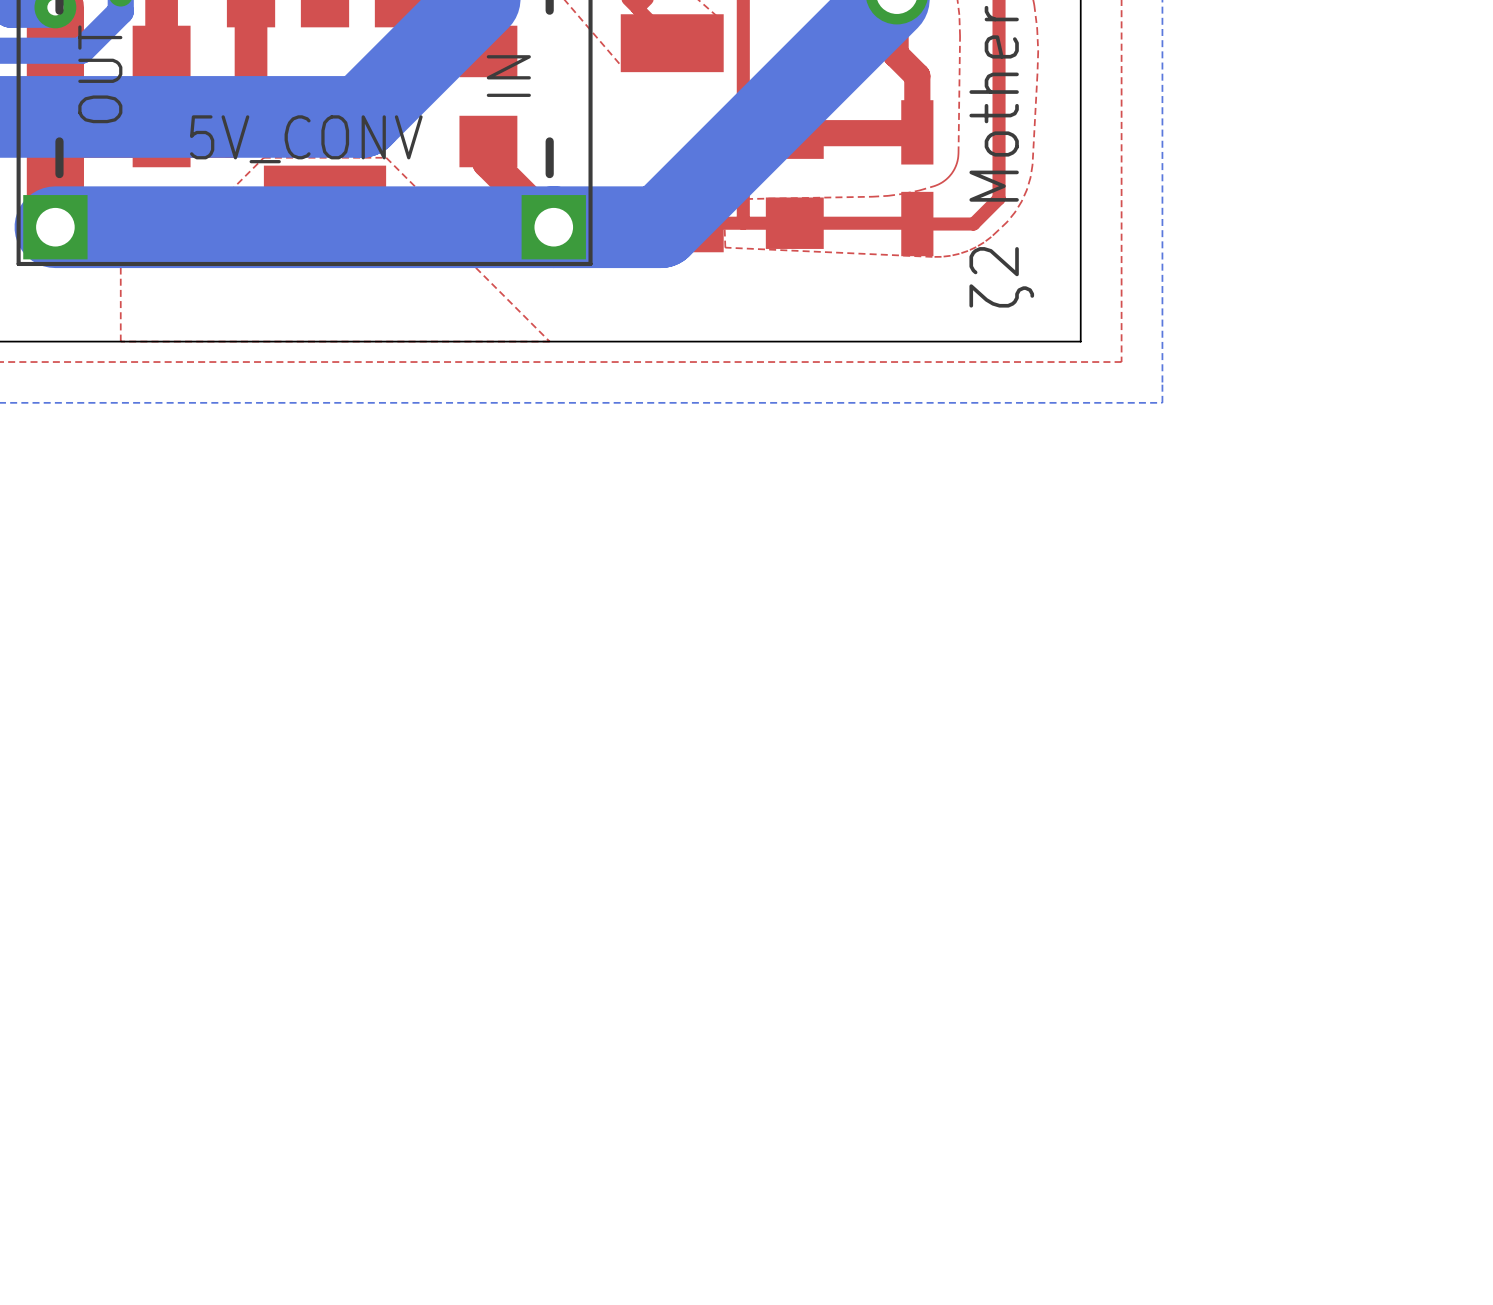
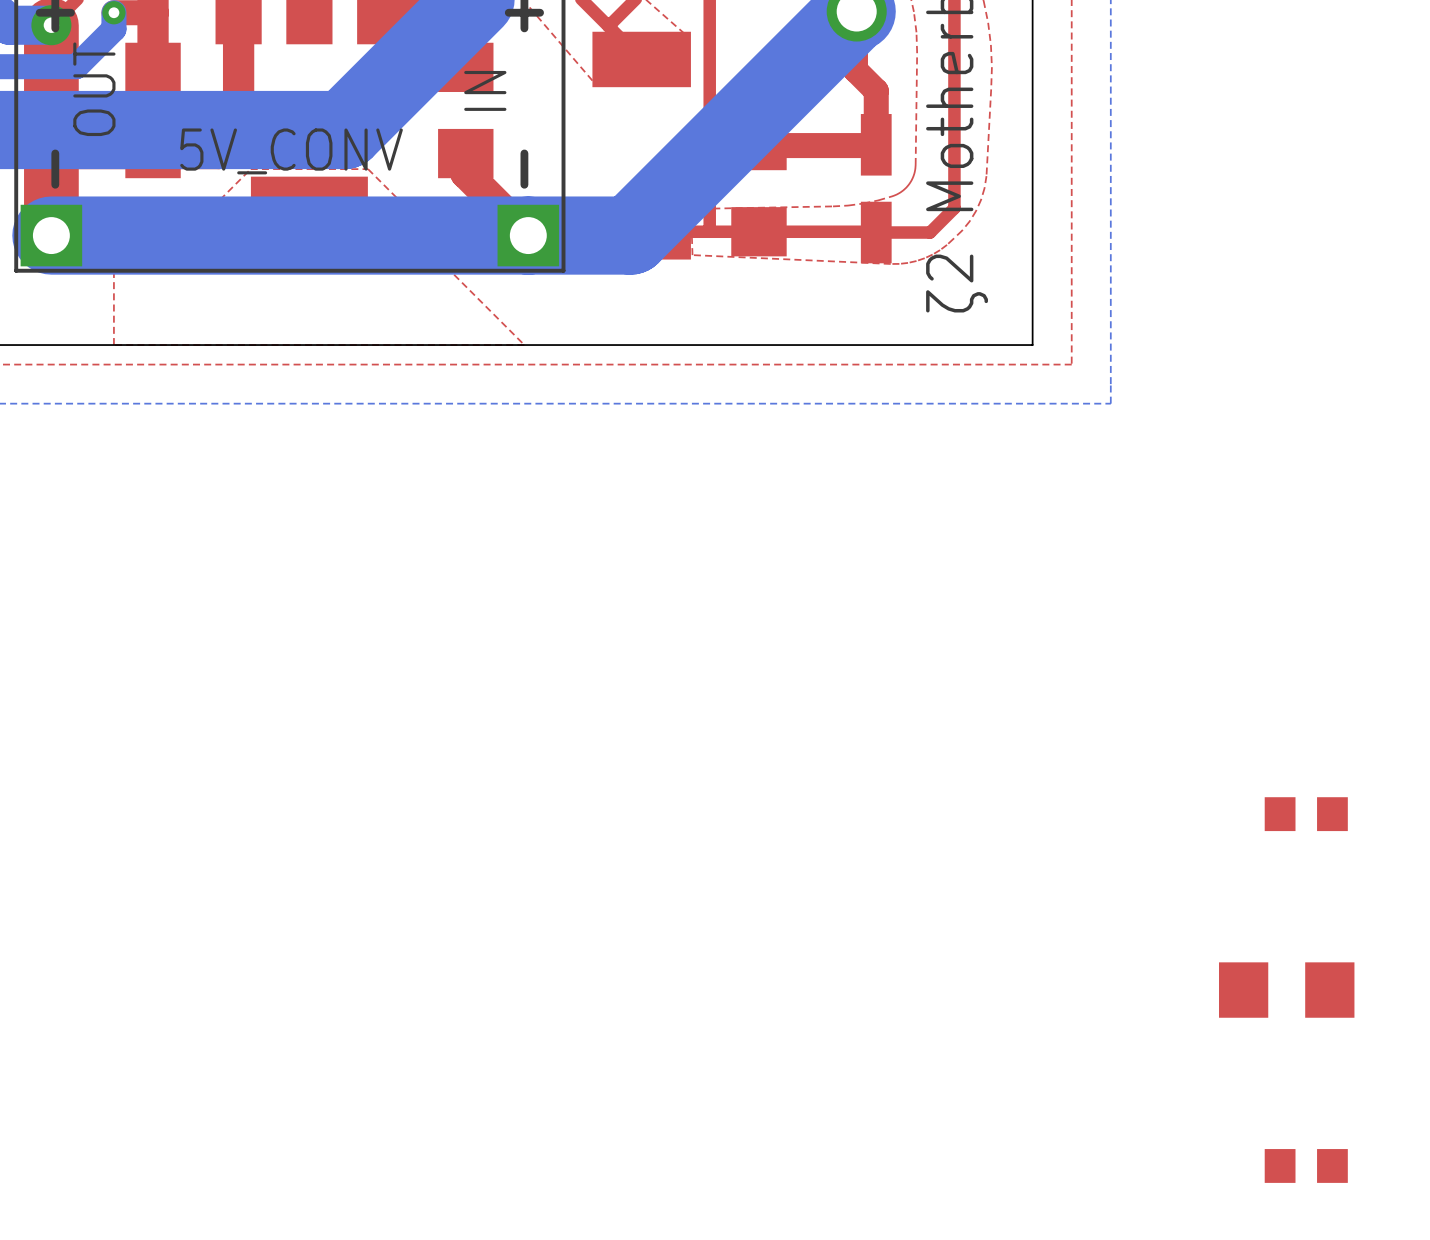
part: none -> (1306, 814)
part: none -> (1286, 990)
part: none -> (1306, 1165)

